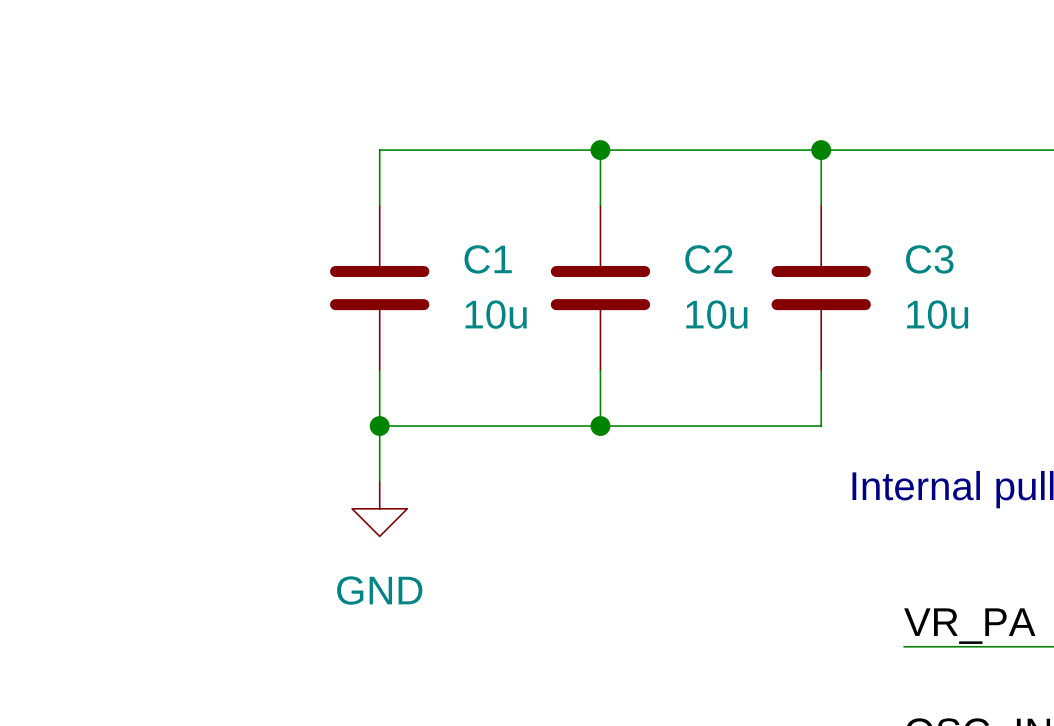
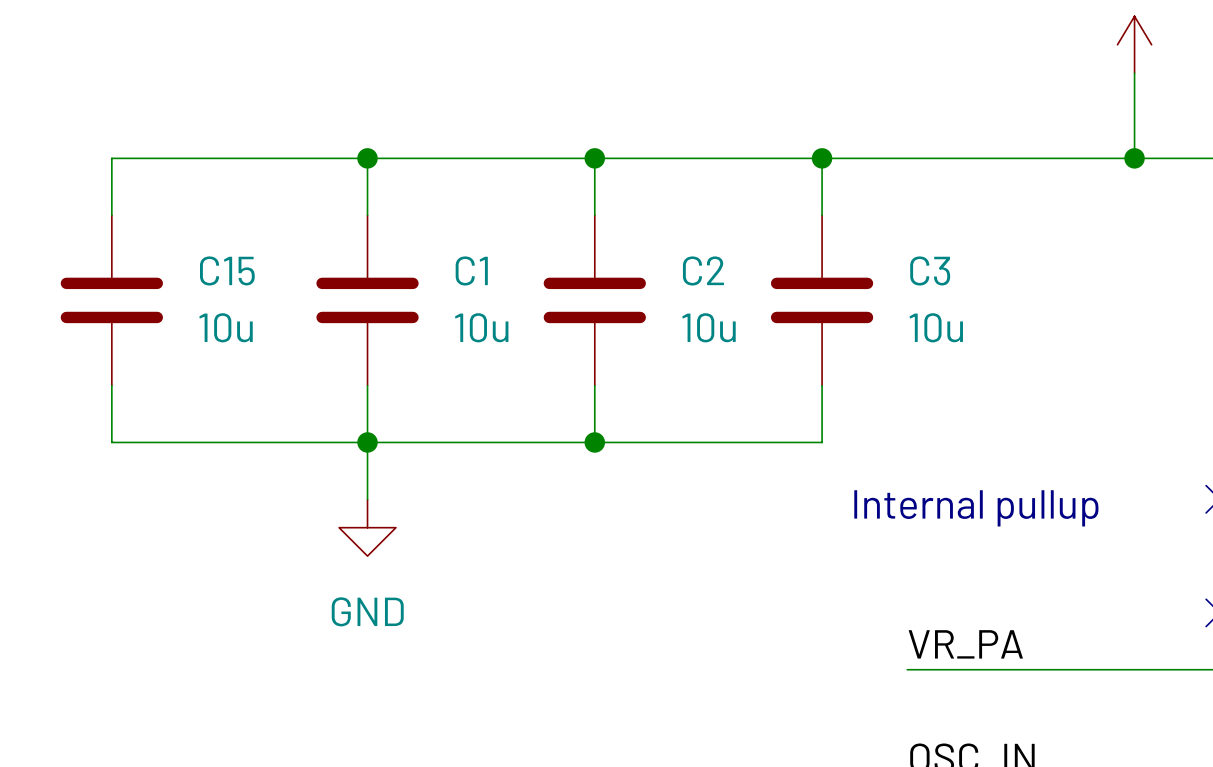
wire: none -> (367, 158) (111, 158) (111, 215)
junction: none -> (367, 158)
C15: none -> 10u (111, 300)
wire: none -> (111, 385) (111, 442) (367, 442)

